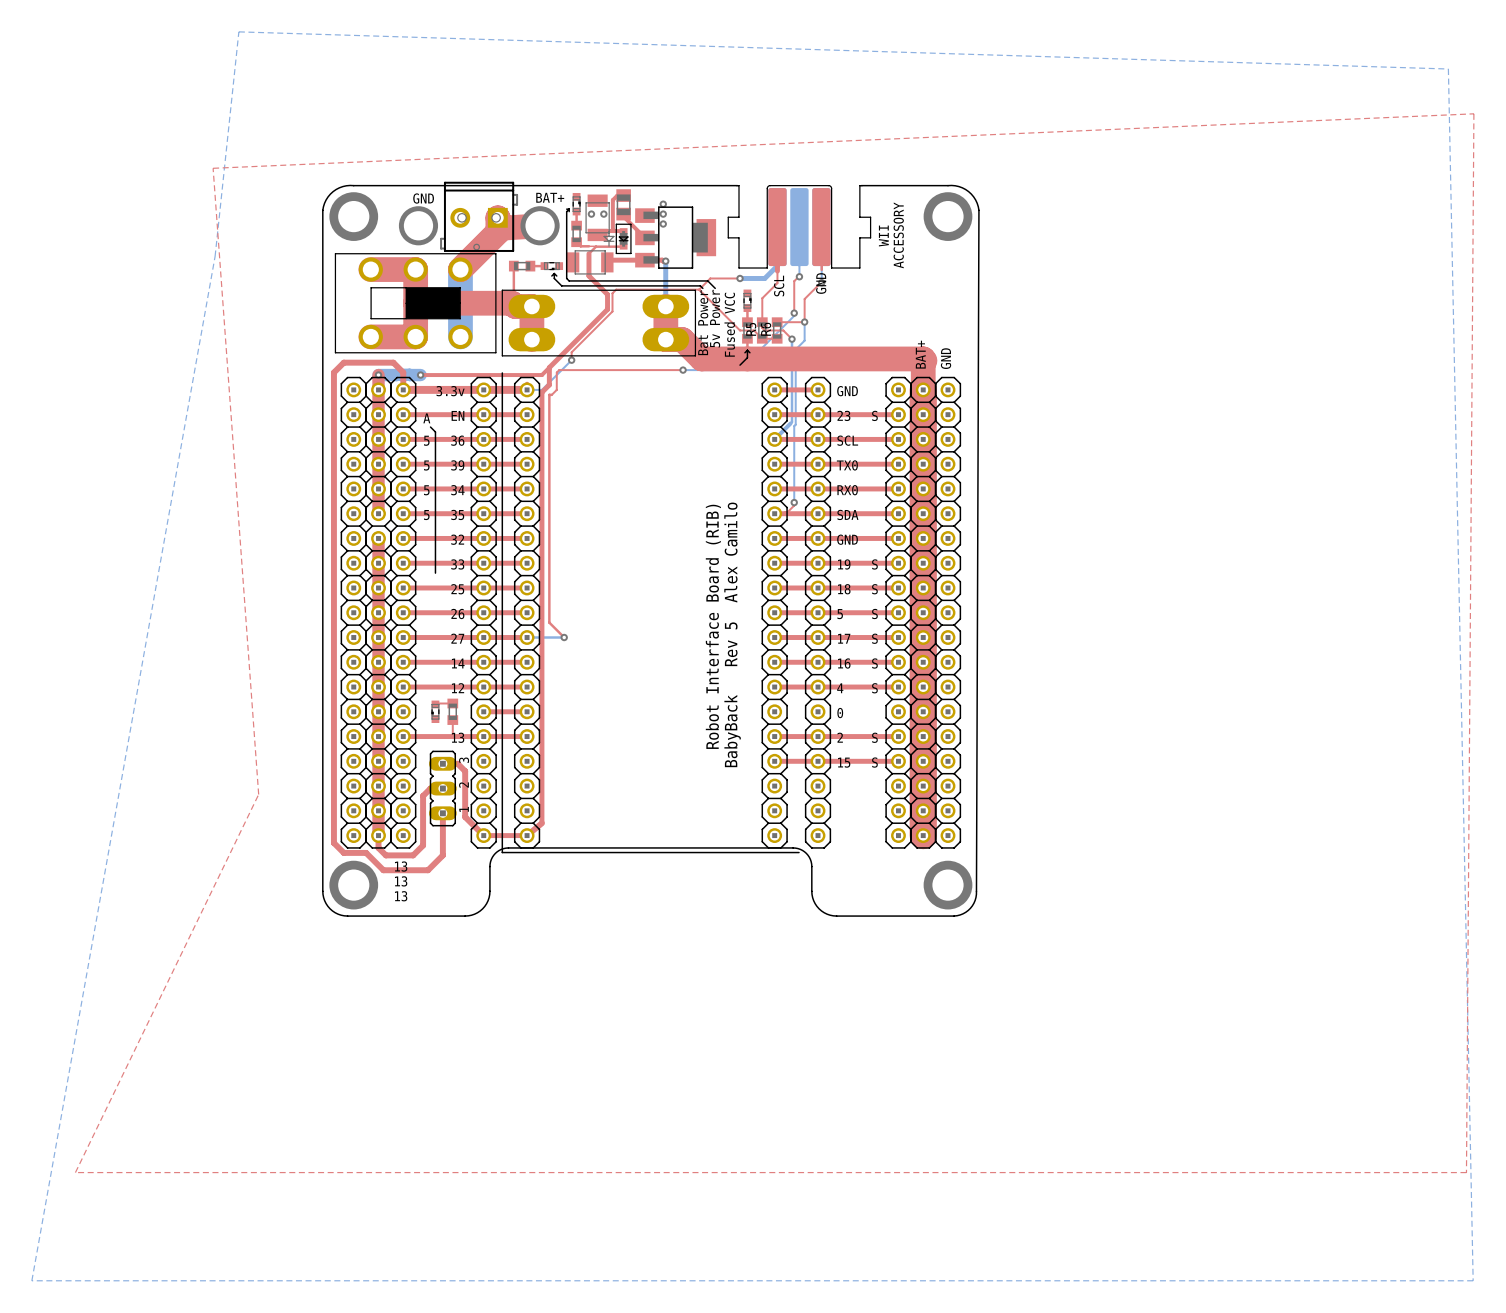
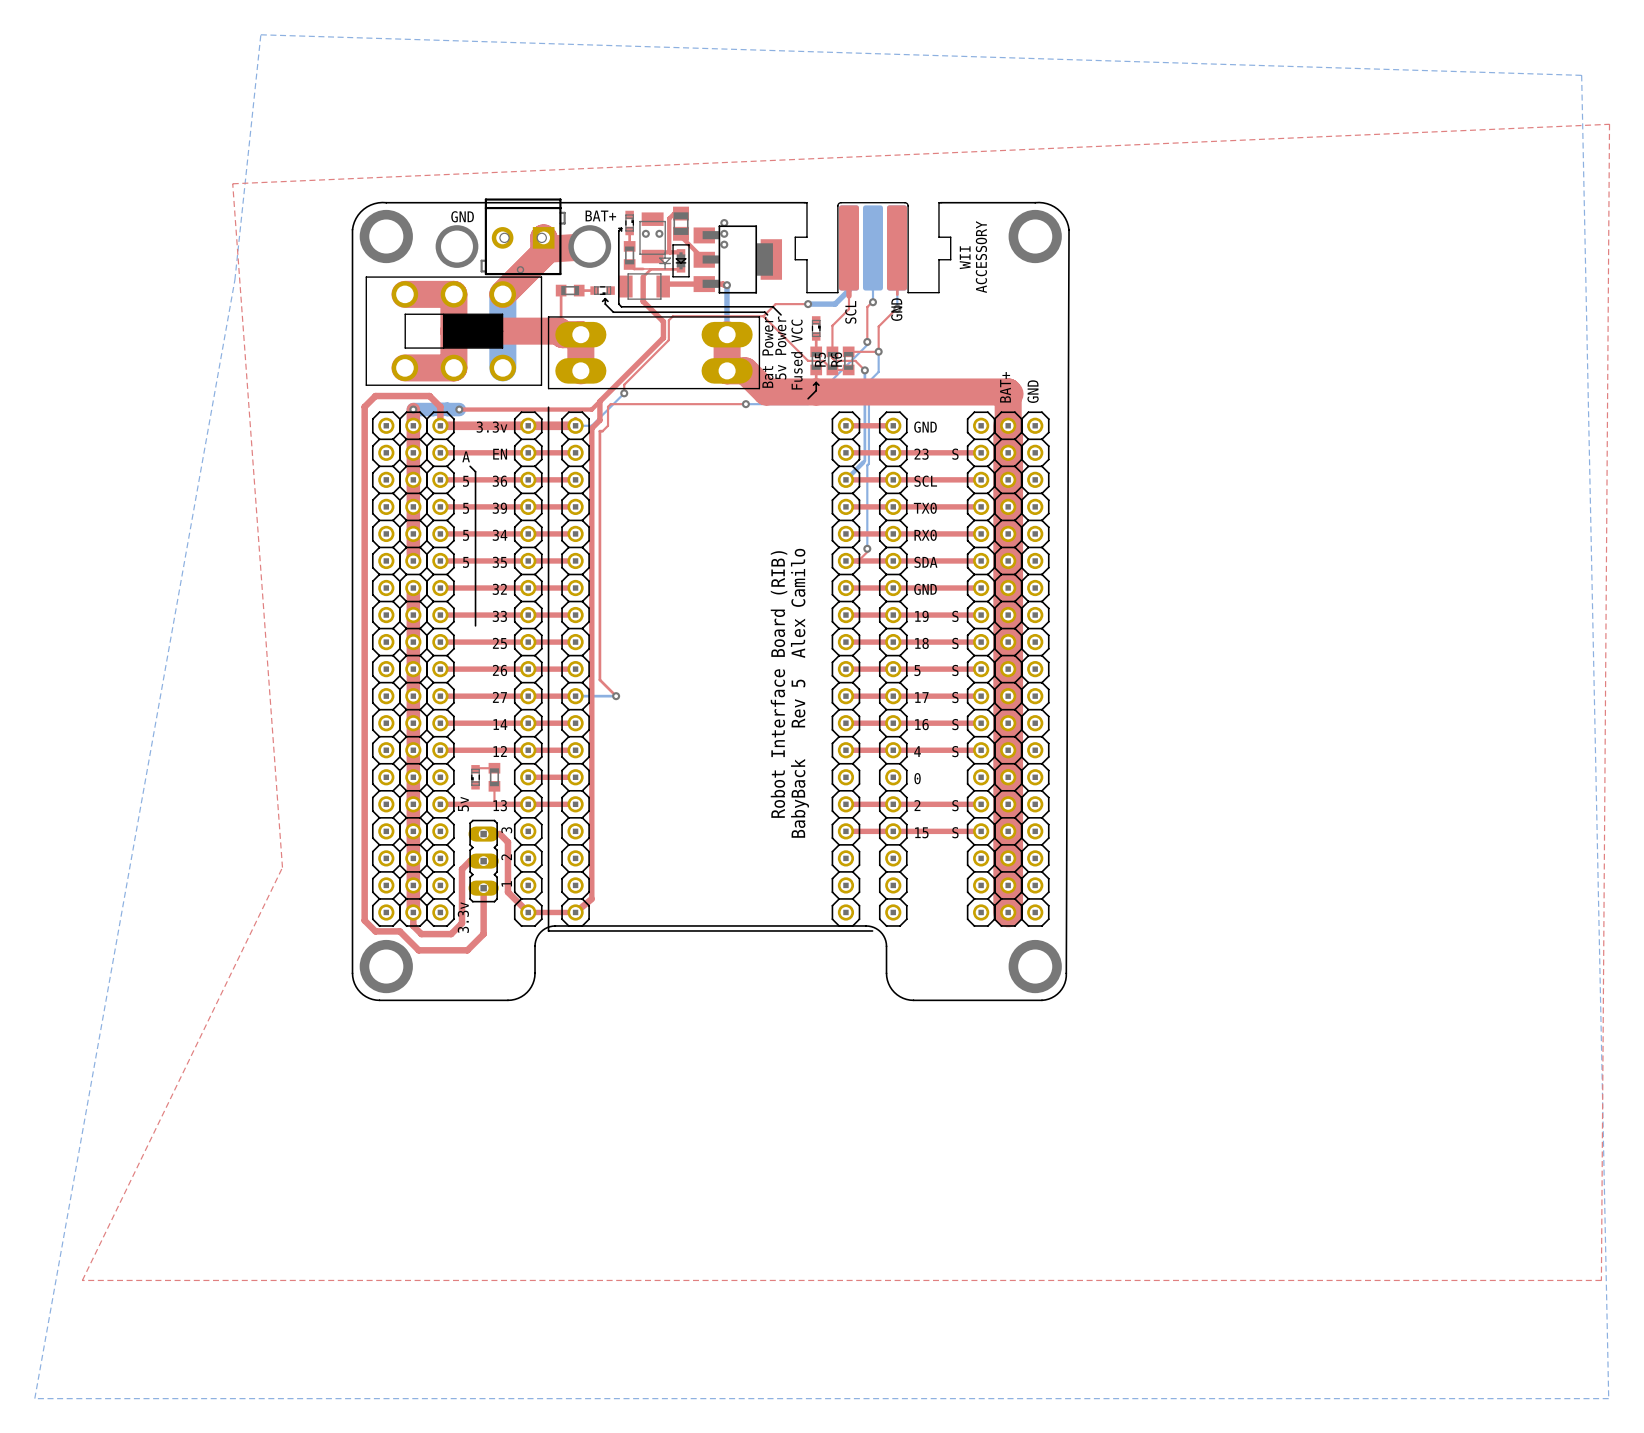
text: none -> 5v (463, 804)
text: none -> 3.3v (463, 917)
text: 13 (401, 866) -> none
text: 13 (401, 881) -> none
text: 13 (401, 896) -> none

